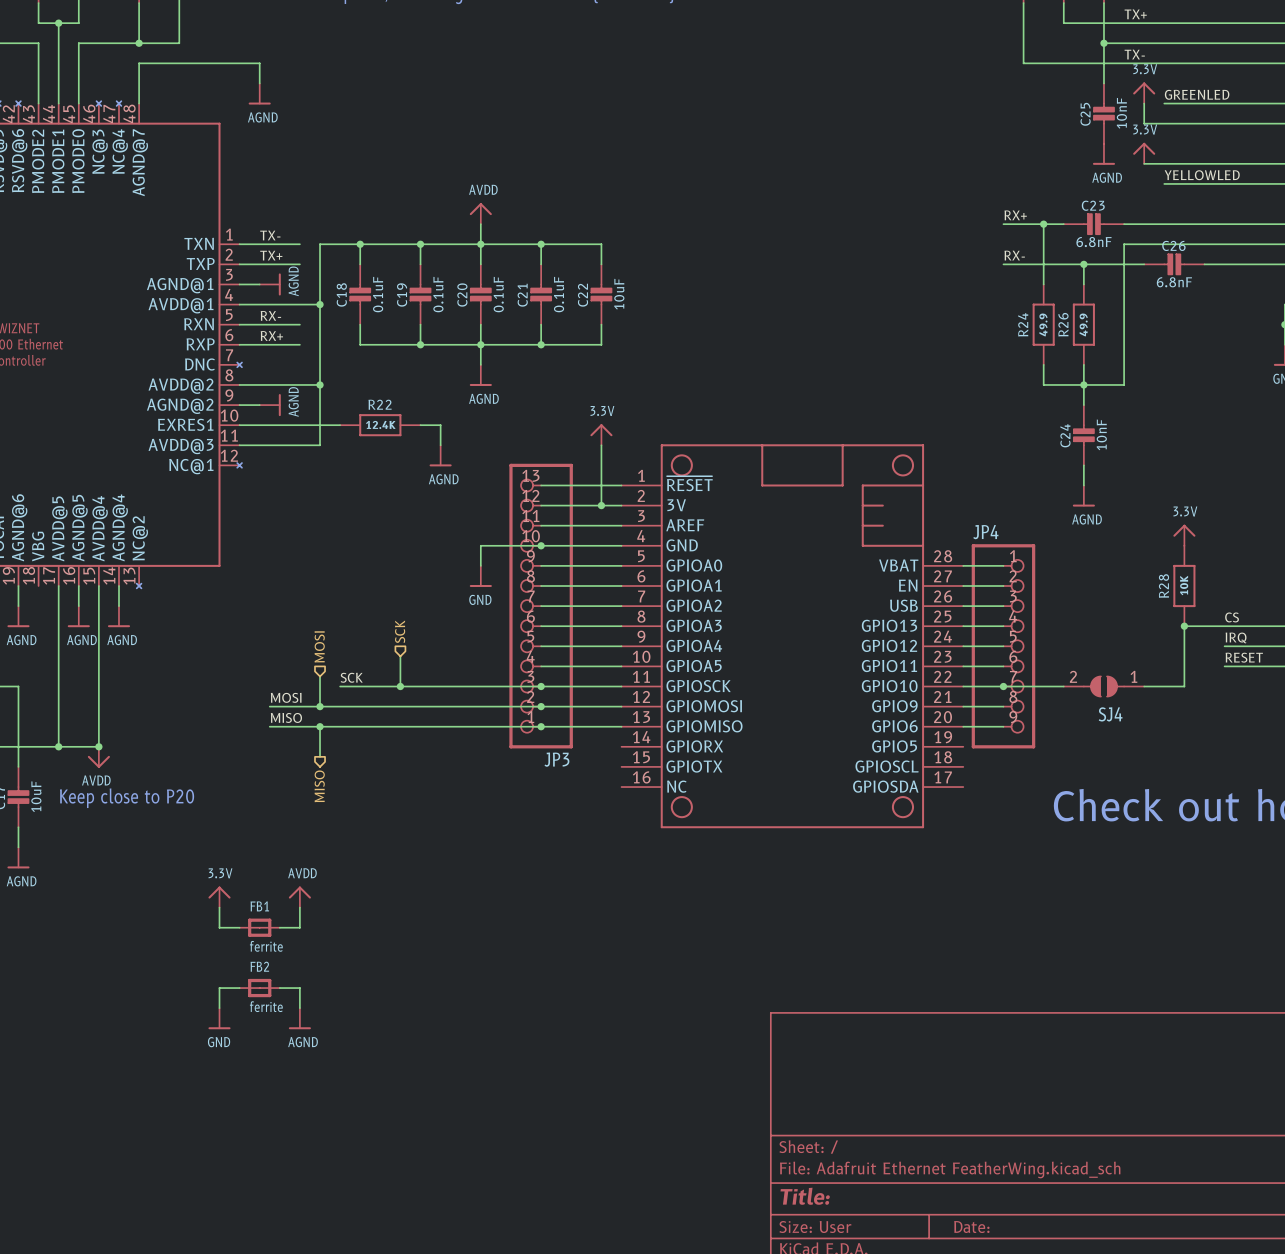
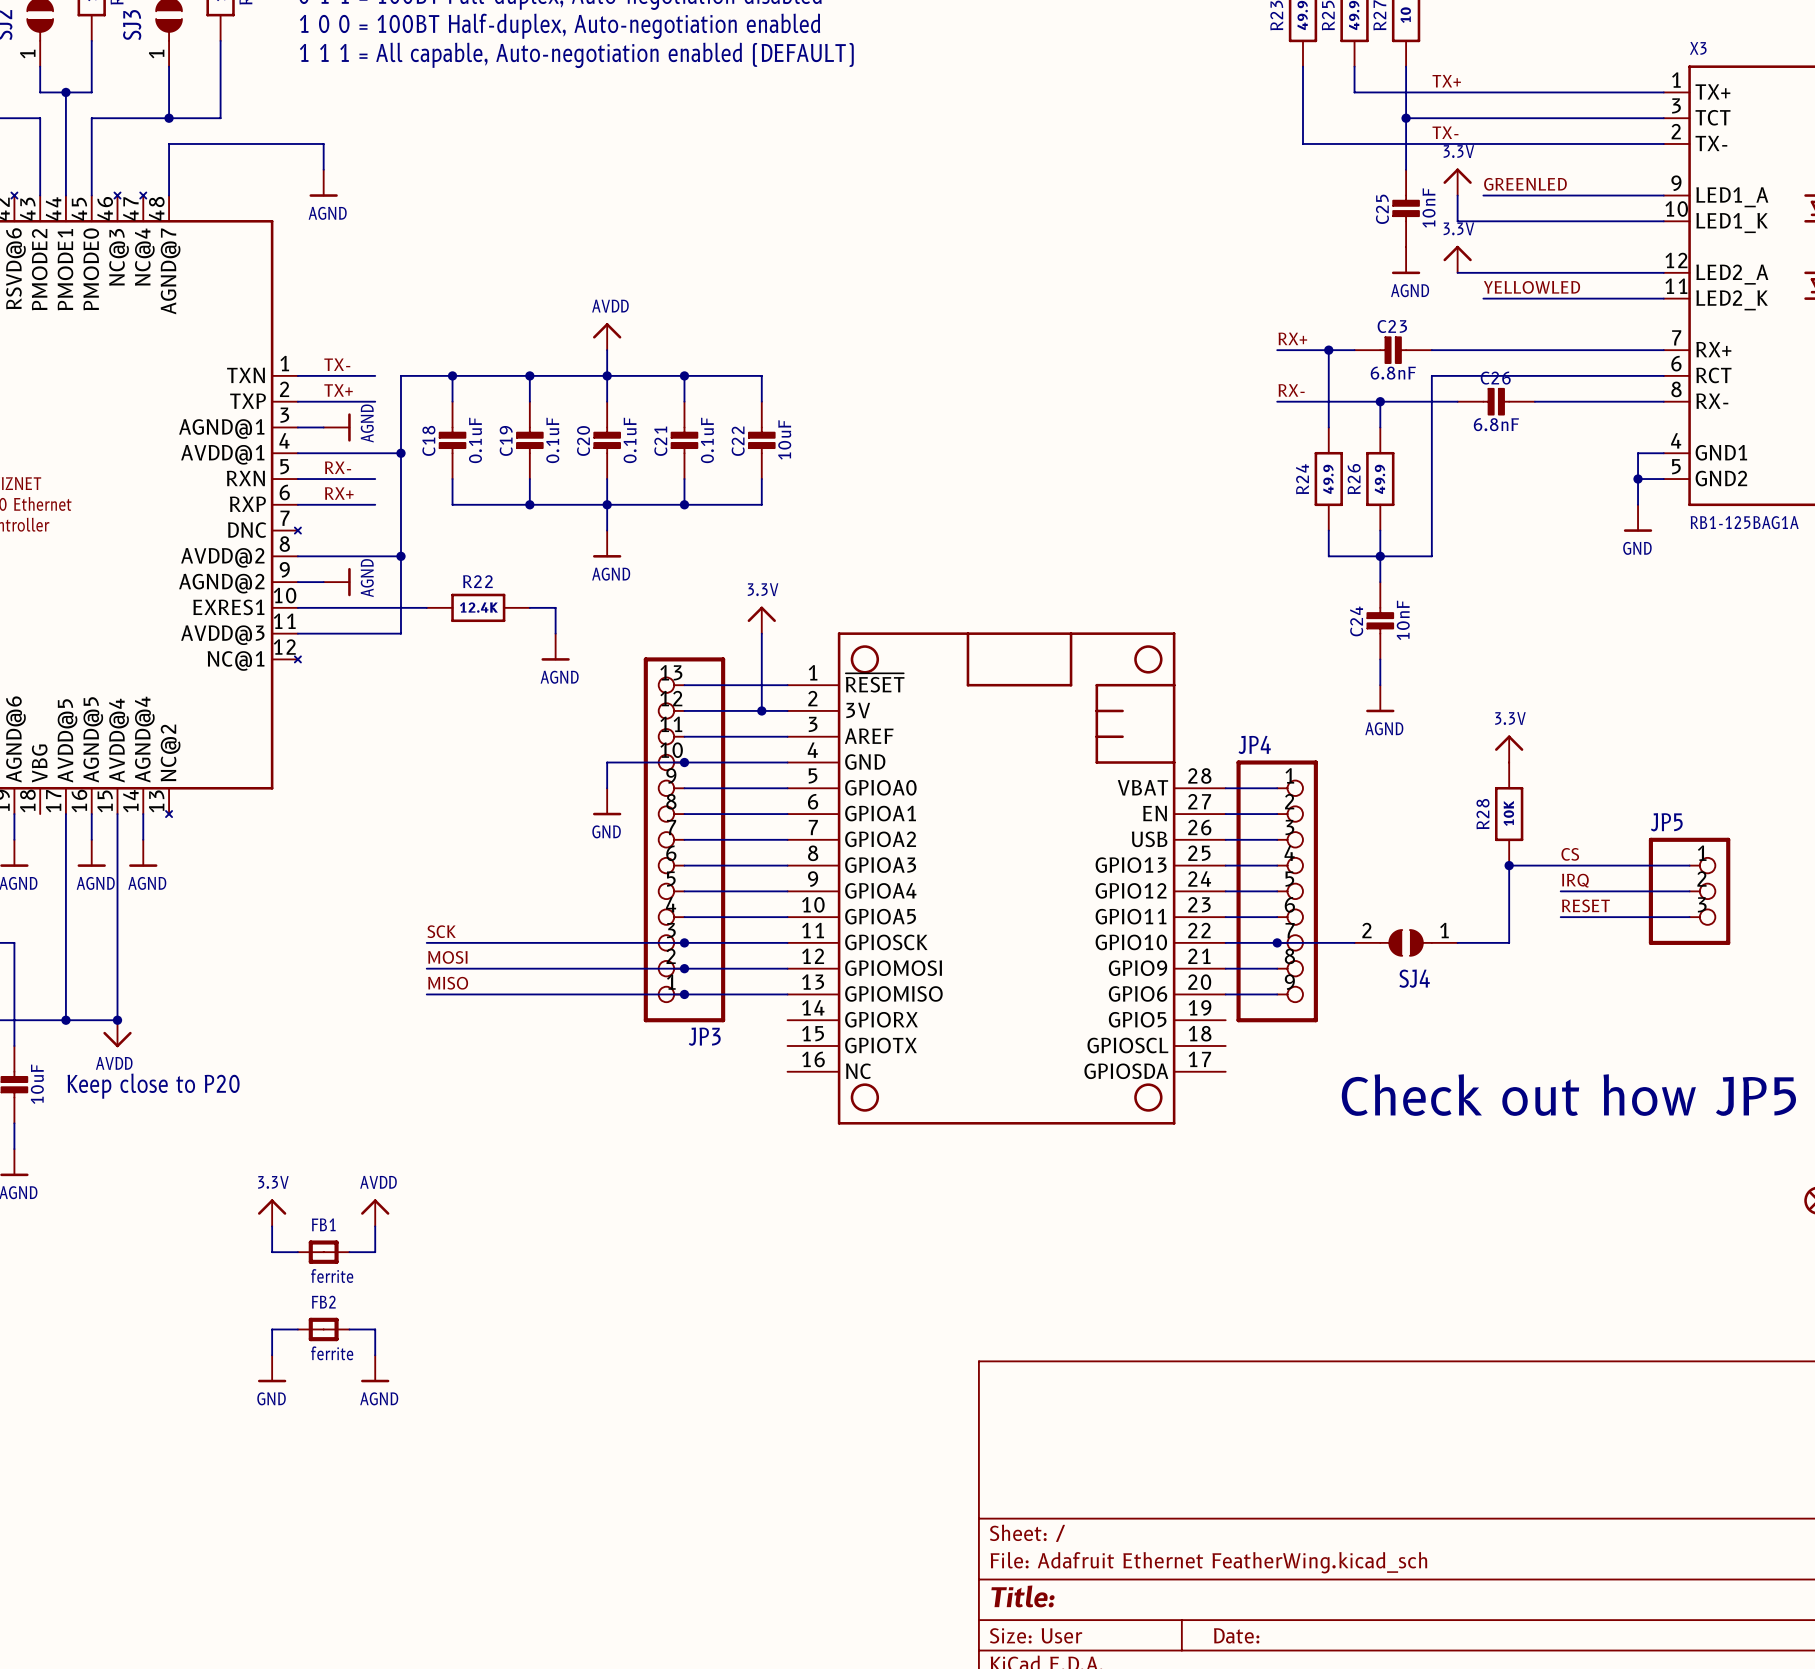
hierarchical label: SCK (400, 631) -> none
hierarchical label: MOSI (319, 646) -> none
wire: (400, 656) (400, 686) -> none
wire: (320, 676) (320, 706) -> none
junction: (400, 686) -> none
label position: MOSI (286, 697) -> MOSI (447, 957)
wire: (269, 706) (340, 706) -> none
junction: (320, 706) -> none
label position: MISO (286, 717) -> MISO (448, 983)
wire: (269, 726) (340, 726) -> none
wire: (320, 726) (320, 756) -> none
junction: (320, 726) -> none
hierarchical label: MISO (319, 786) -> none

